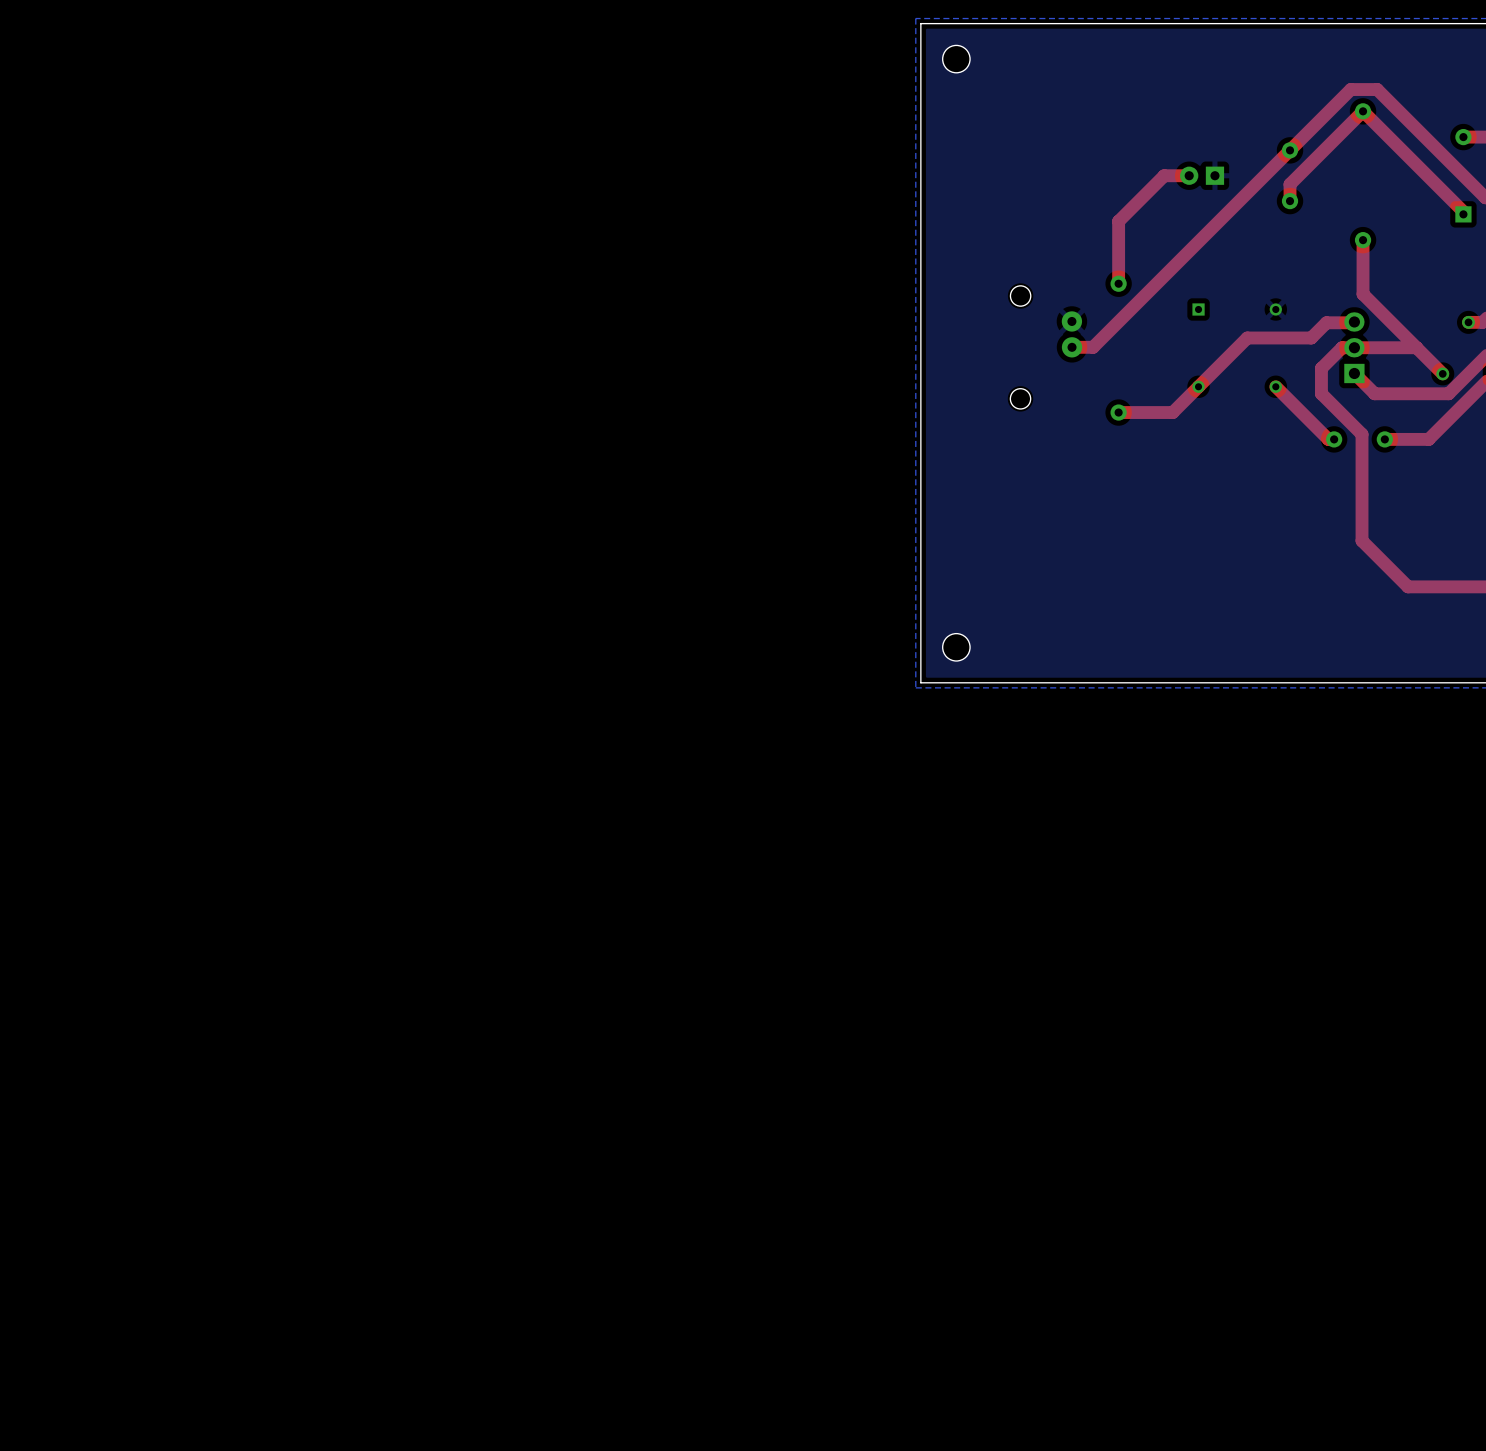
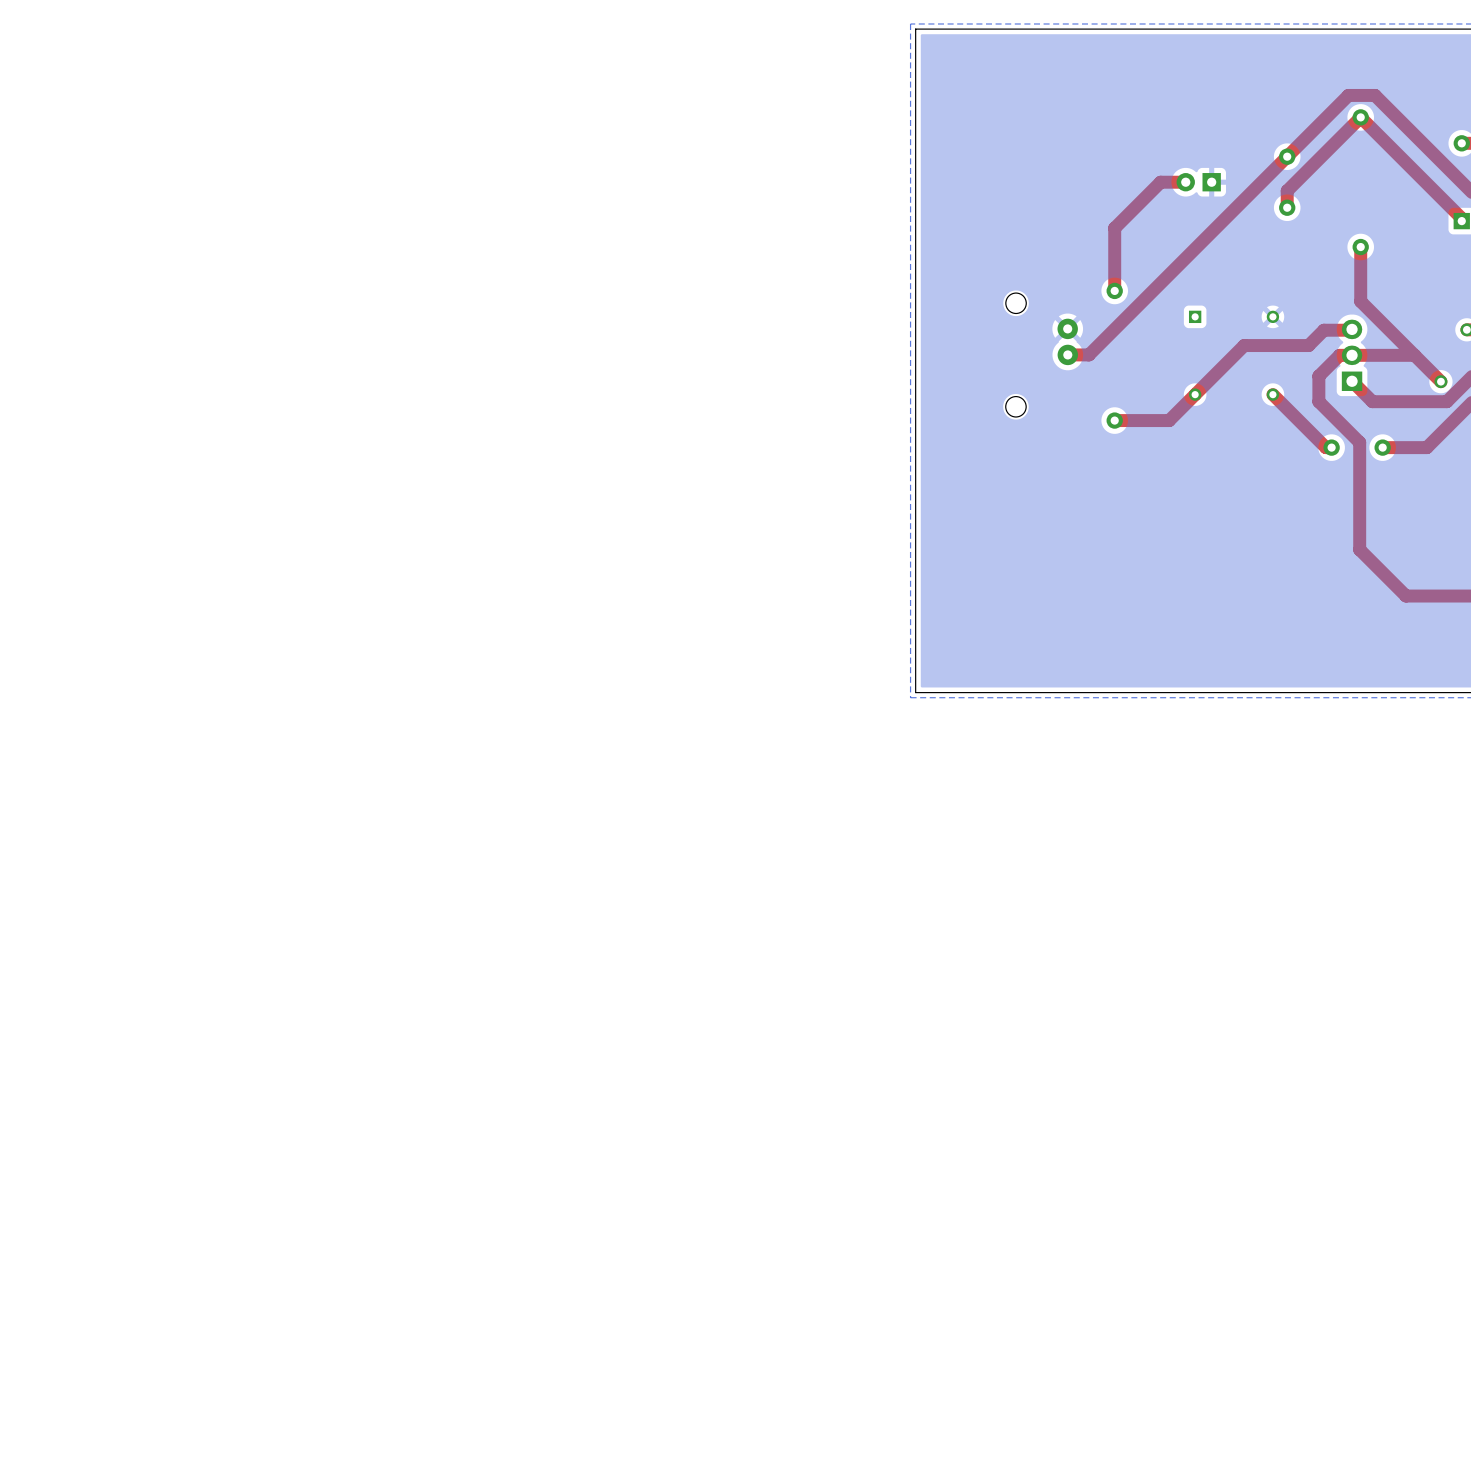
part: (956, 59) -> none
part: (956, 647) -> none

